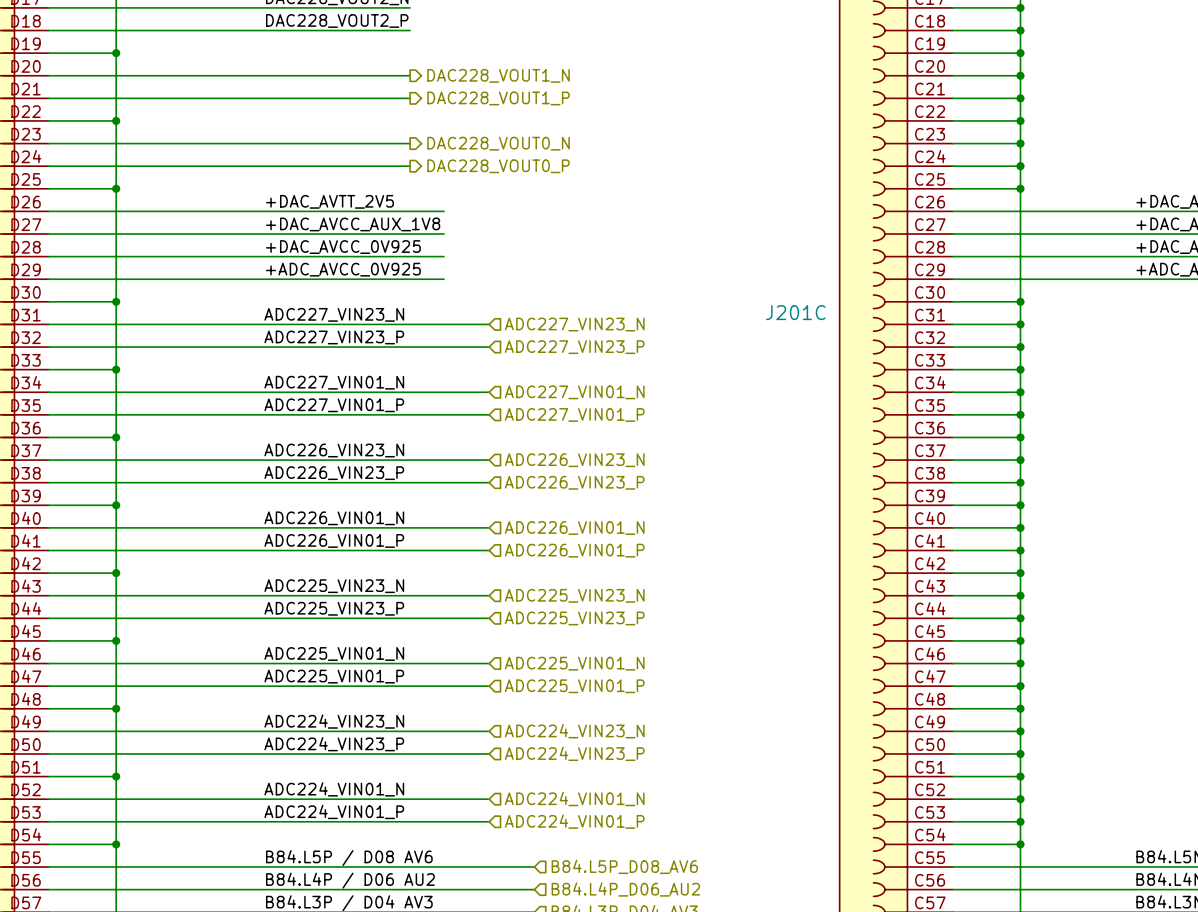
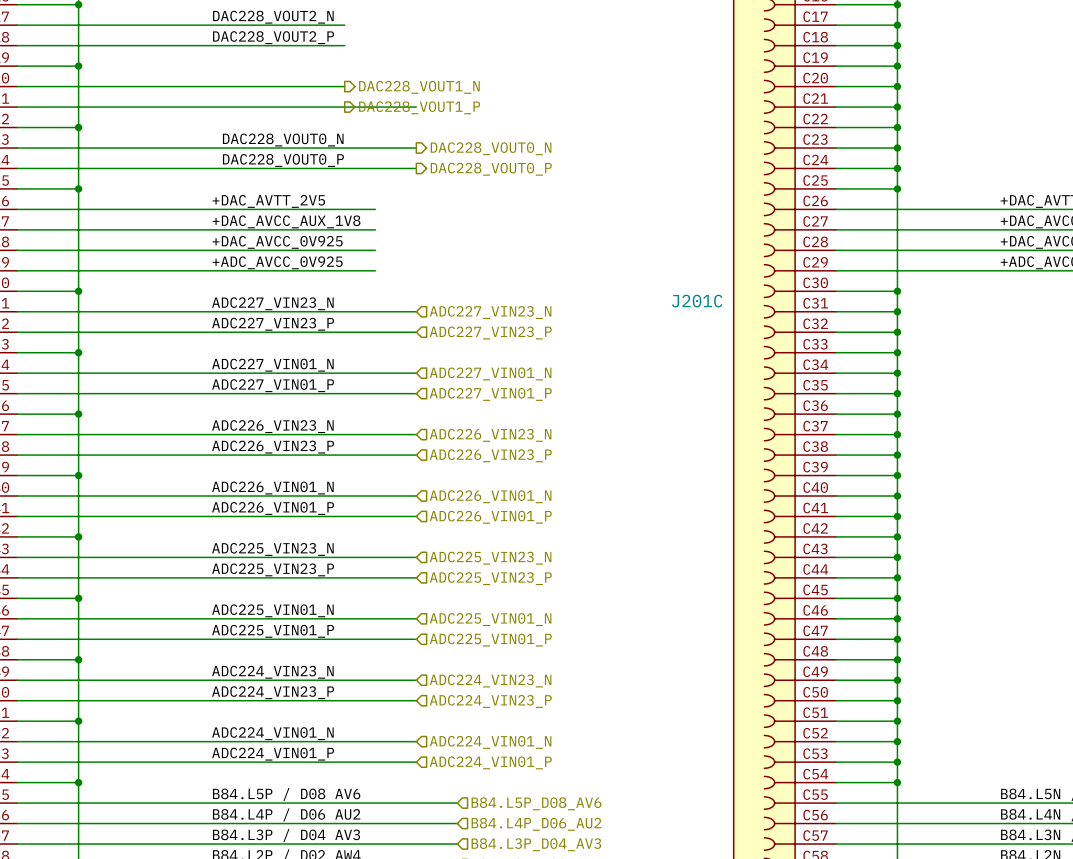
wire: none -> (344, 107) (416, 107)
label: none -> DAC228_VOUT0_N (283, 140)
wire: none -> (344, 147) (416, 147)
hierarchical label position: DAC228_VOUT0_N (498, 143) -> DAC228_VOUT0_N (491, 148)
label: none -> DAC228_VOUT0_P (283, 160)
wire: none -> (344, 168) (416, 168)
hierarchical label position: DAC228_VOUT0_P (498, 166) -> DAC228_VOUT0_P (491, 169)

